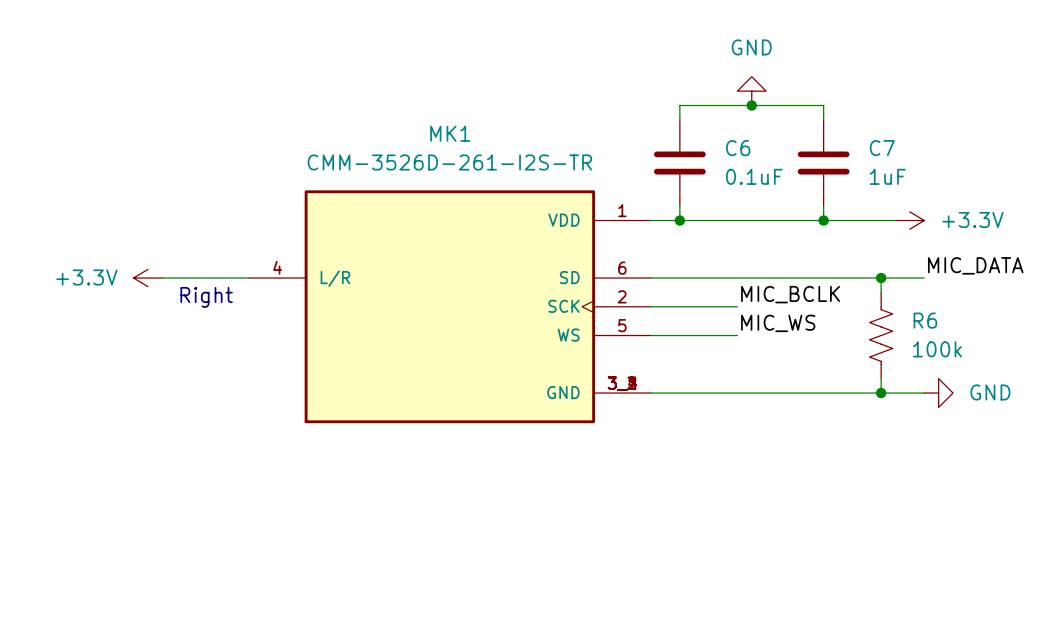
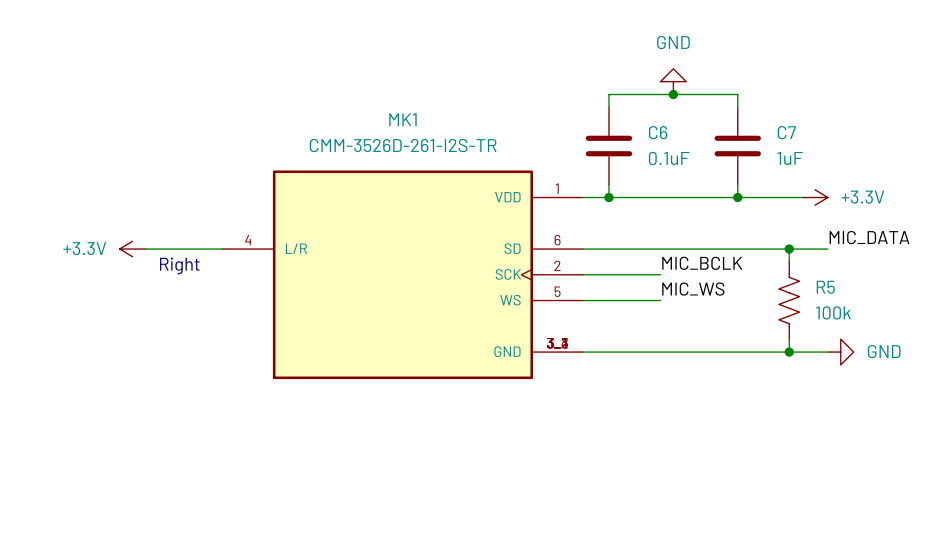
R6 name: R6 (925, 320) -> R5 (825, 287)

